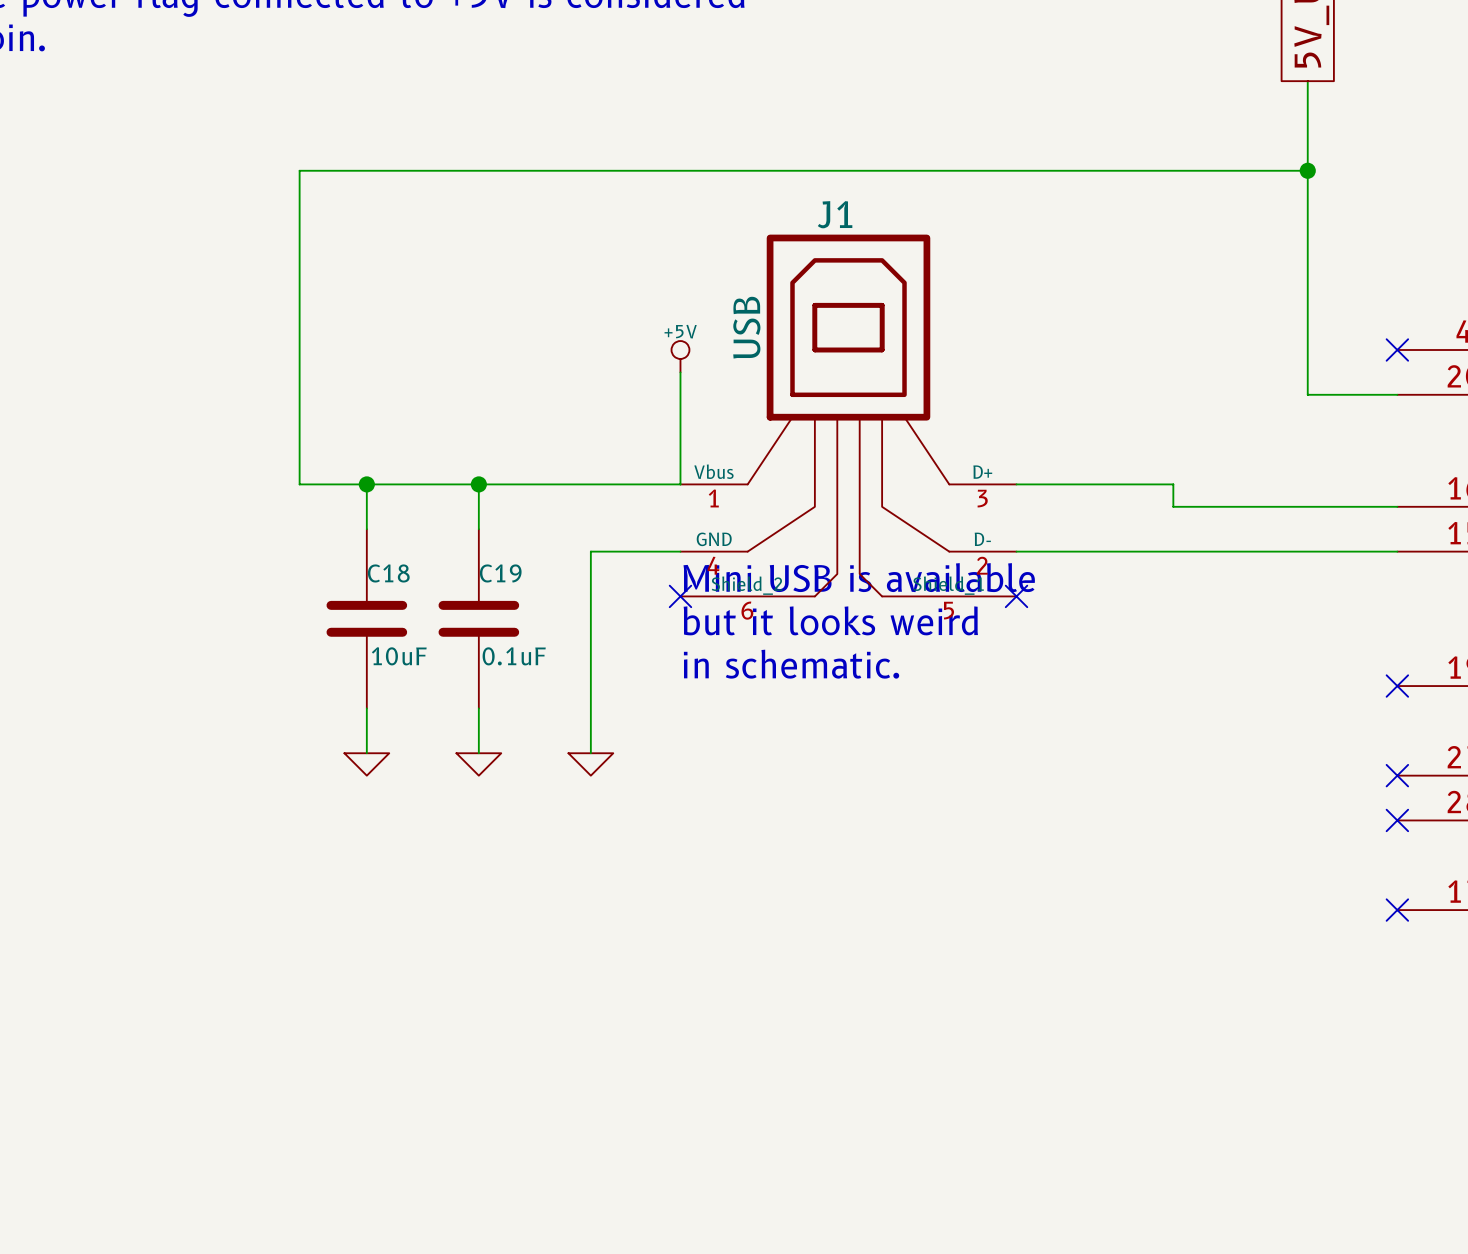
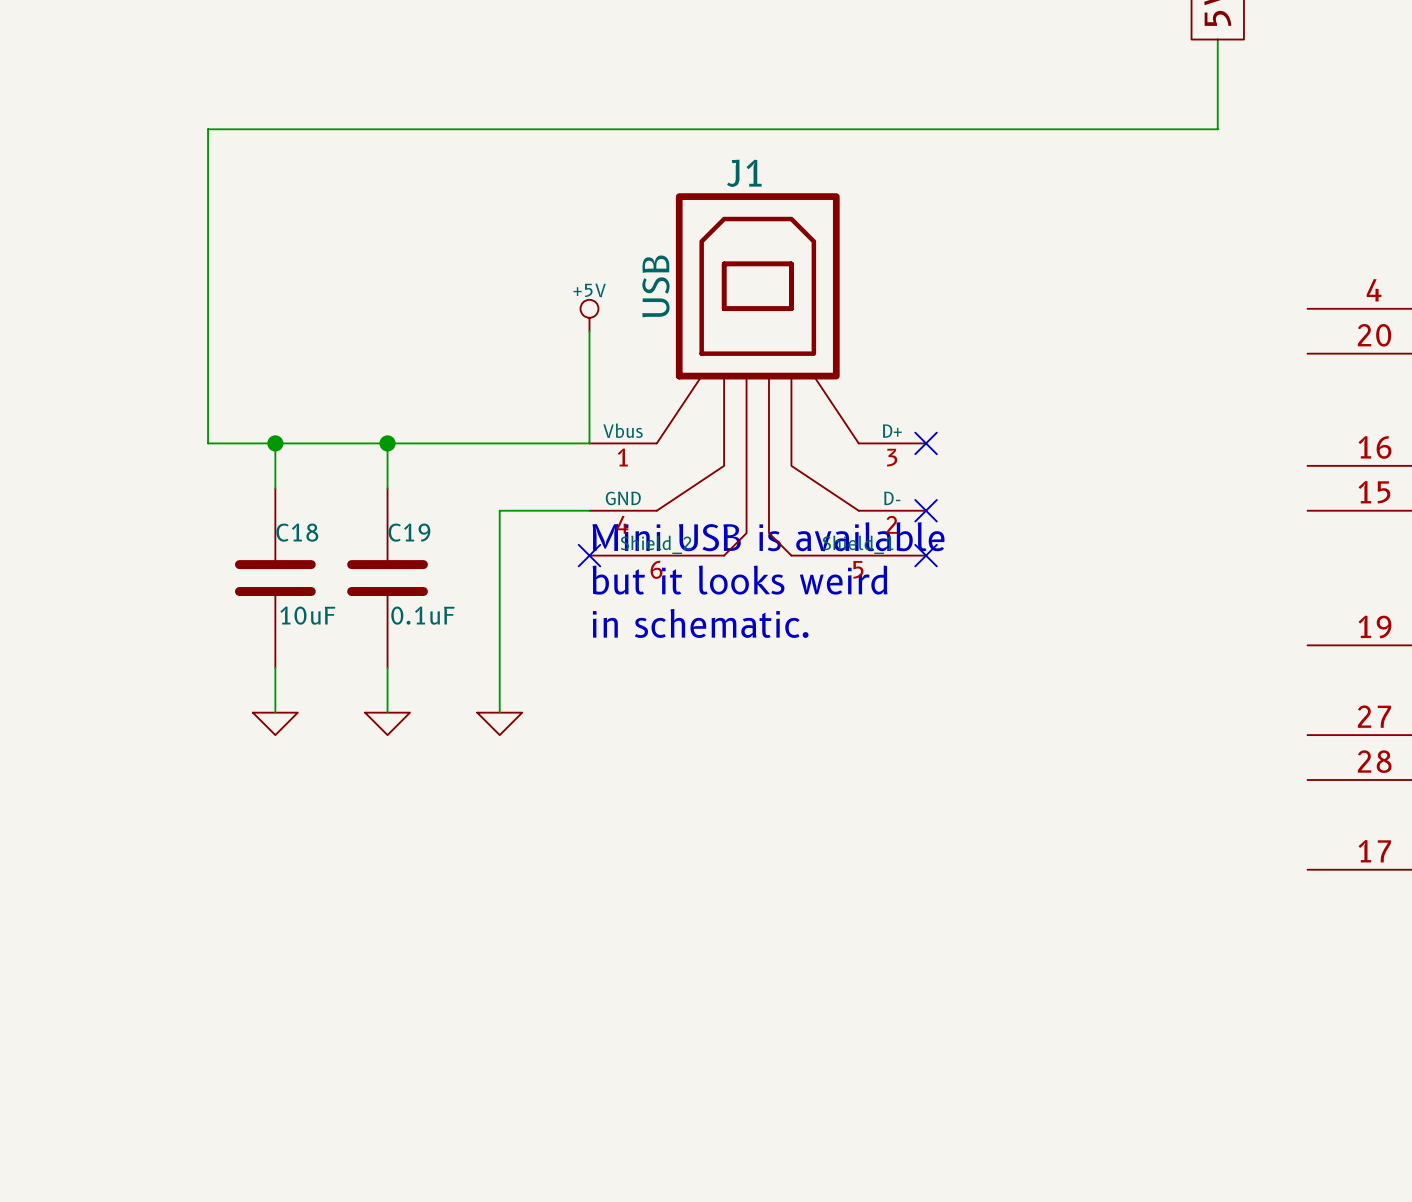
wire: (1307, 170) (1307, 394) (1397, 394) -> none
junction: (1307, 170) -> none
no-connect mark: (1397, 349) -> none
wire: (1016, 484) (1173, 484) (1173, 506) (1397, 506) -> none
no-connect mark: none -> (926, 443)
wire: (1016, 551) (1397, 551) -> none
no-connect mark: none -> (926, 510)
no-connect mark: (1397, 686) -> none
no-connect mark: (1397, 775) -> none
no-connect mark: (1397, 820) -> none
no-connect mark: (1397, 910) -> none

